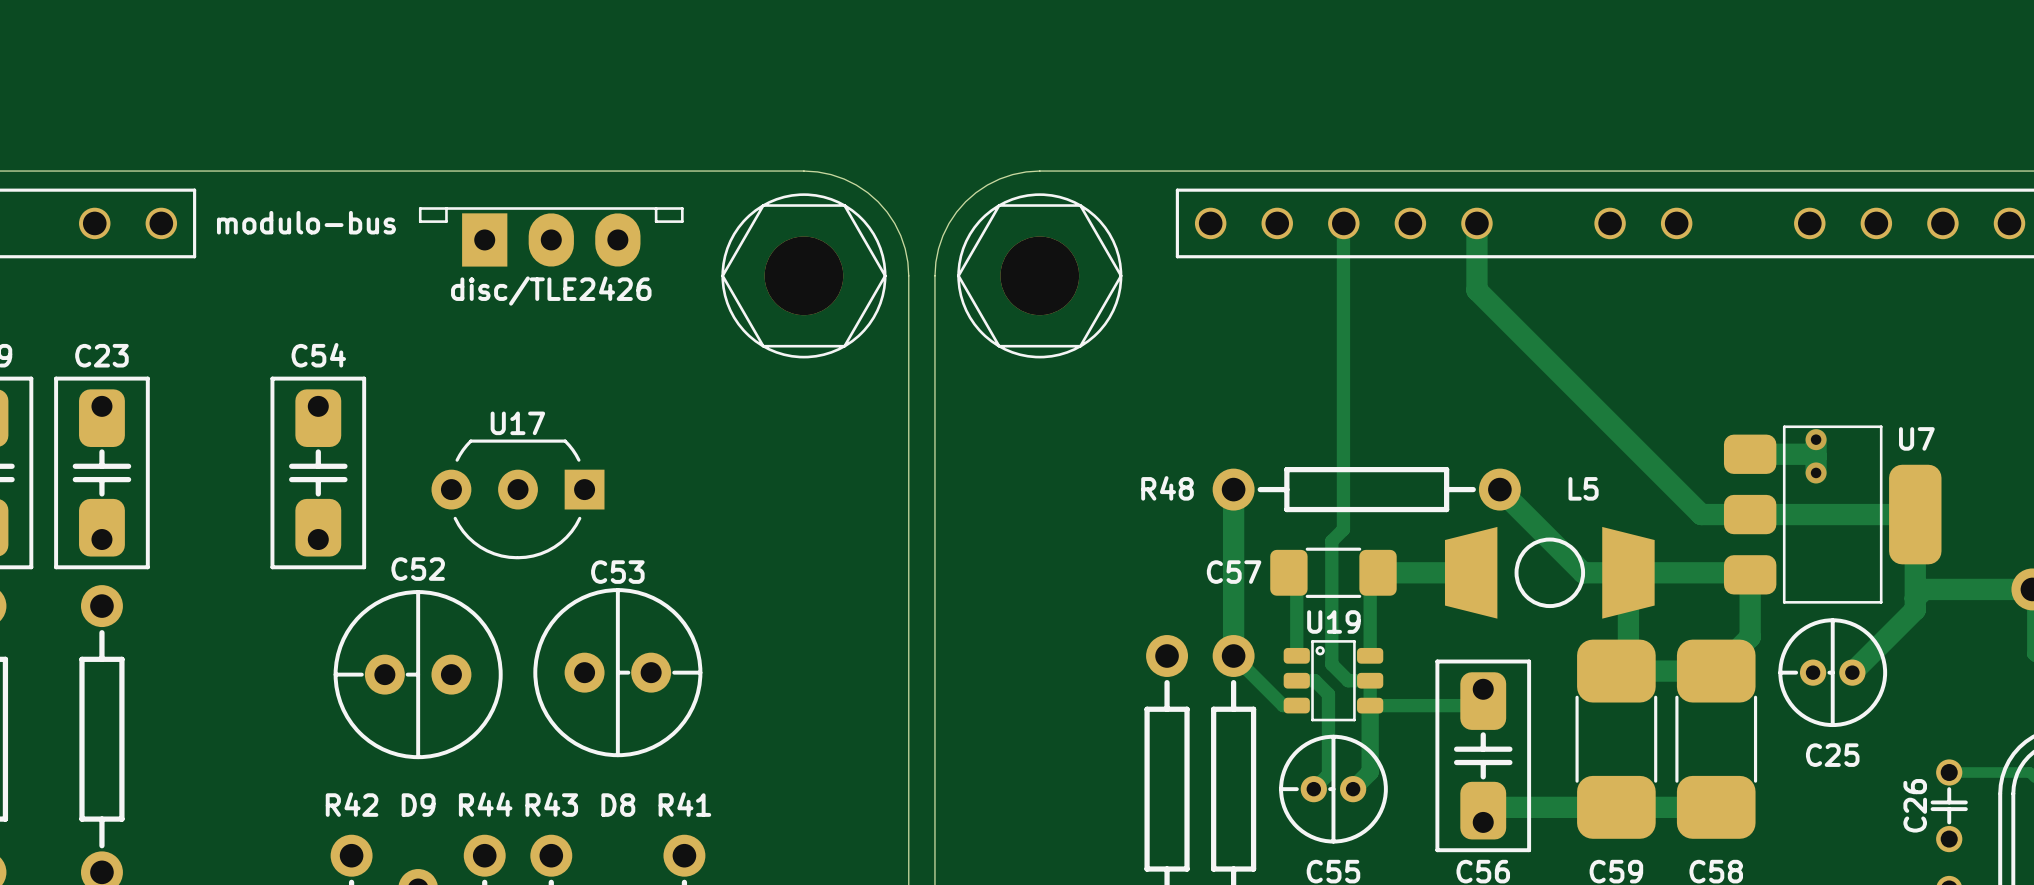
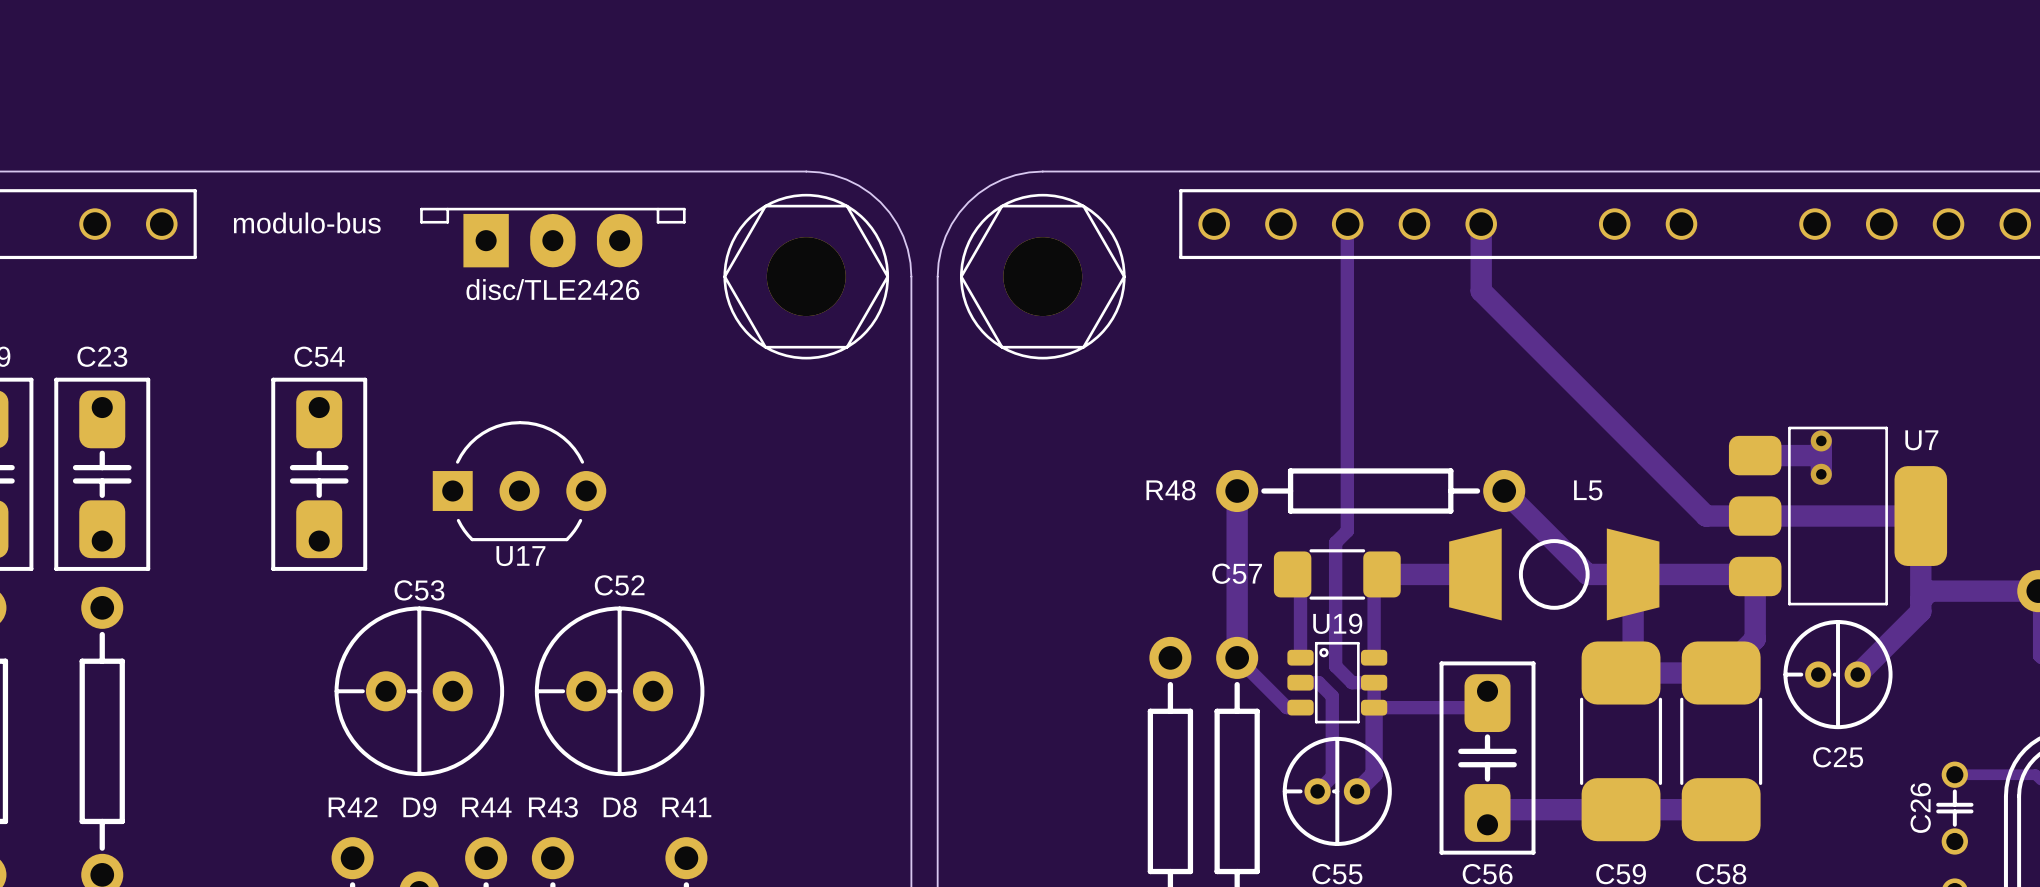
U17 rotation: 0° (518, 499) -> 180° (519, 481)
C53 rotation: 0° (617, 672) -> 180° (419, 691)
C53 position: (617, 672) -> (419, 691)
C52 position: (418, 674) -> (619, 691)

